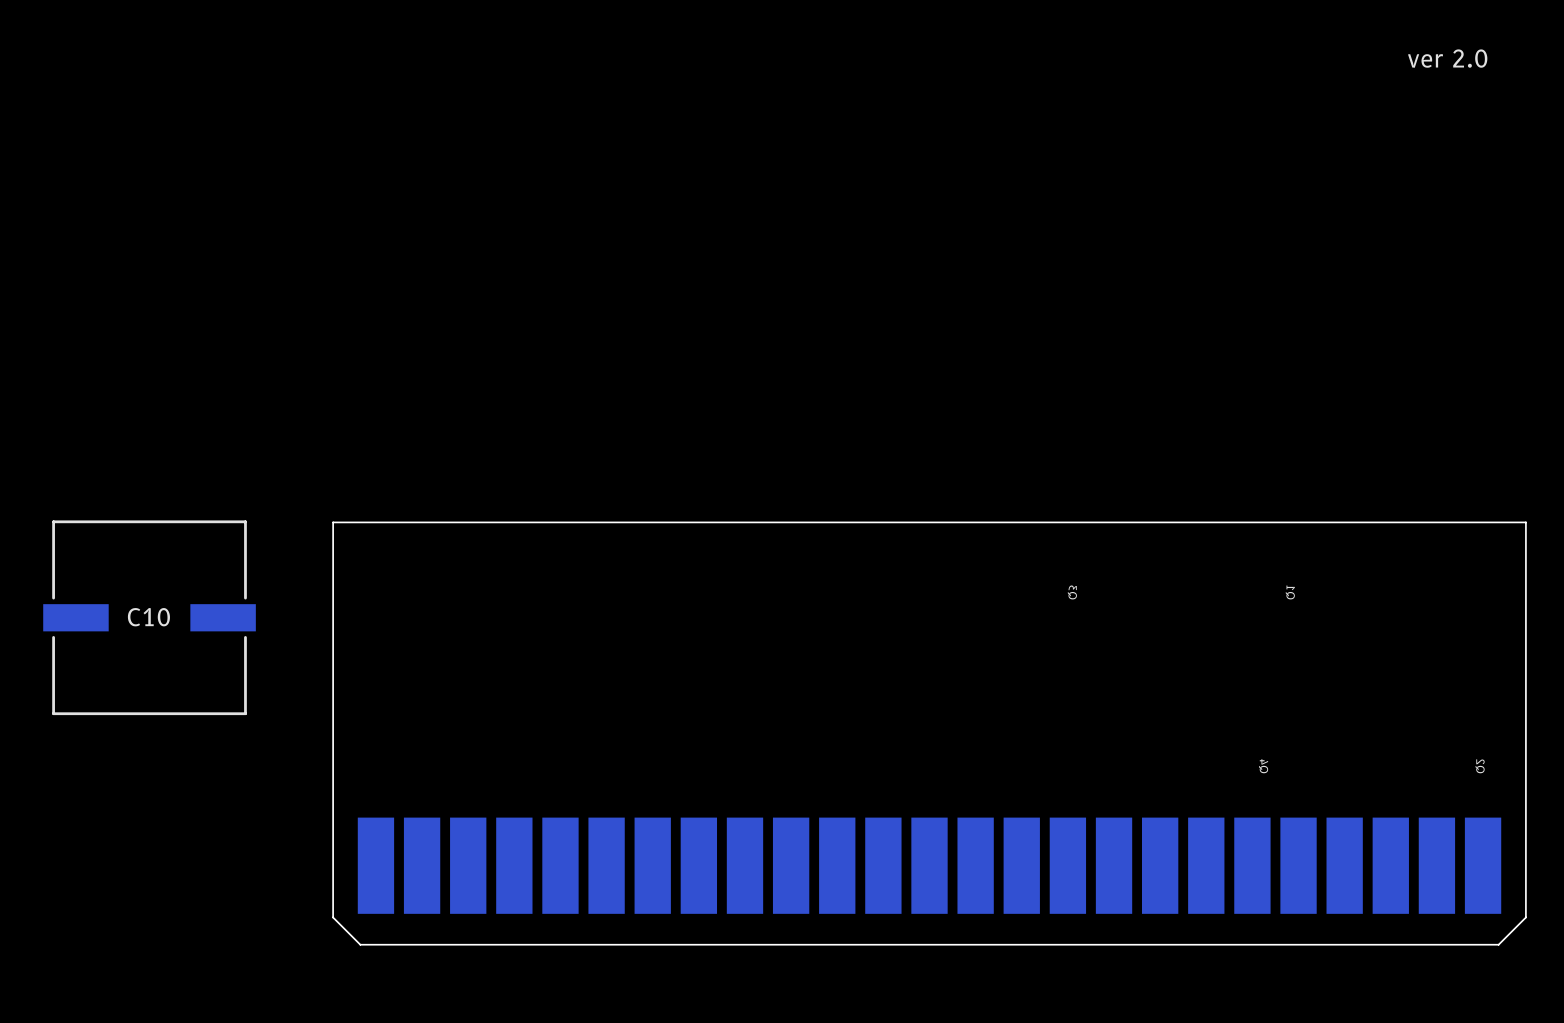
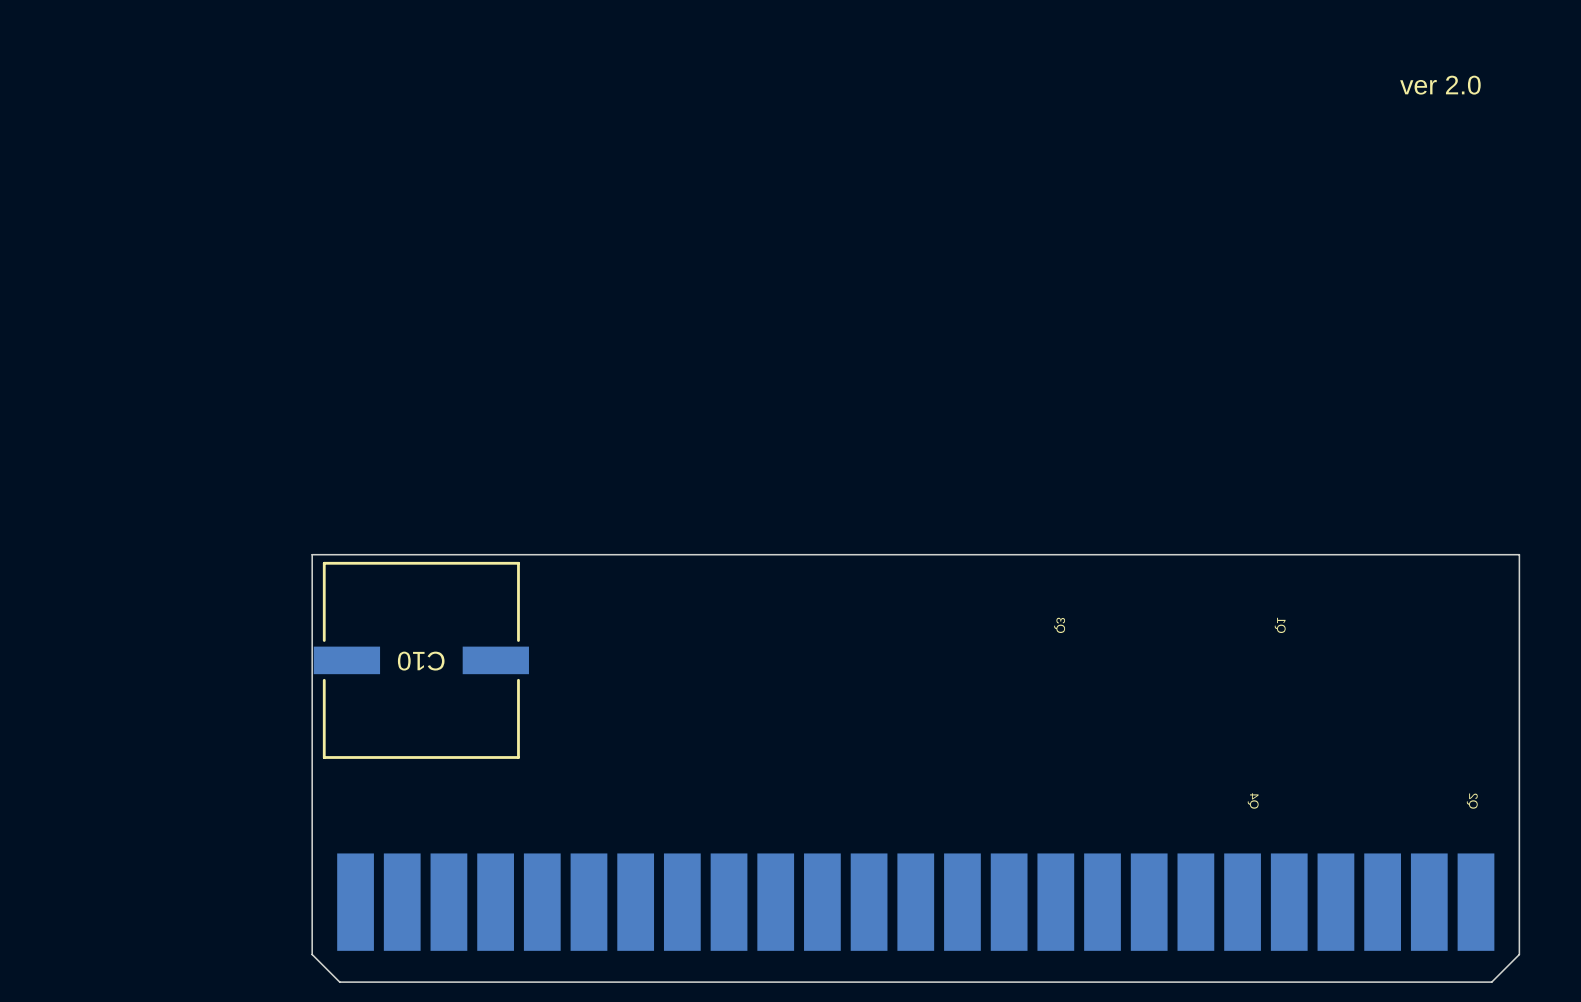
C10 name rotation: 0° (148, 617) -> 180° (421, 661)
C10 position: (149, 617) -> (421, 660)

